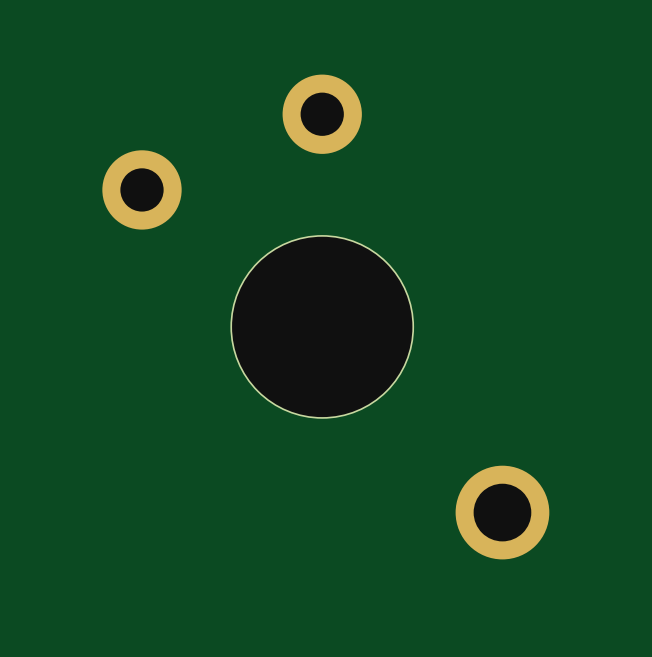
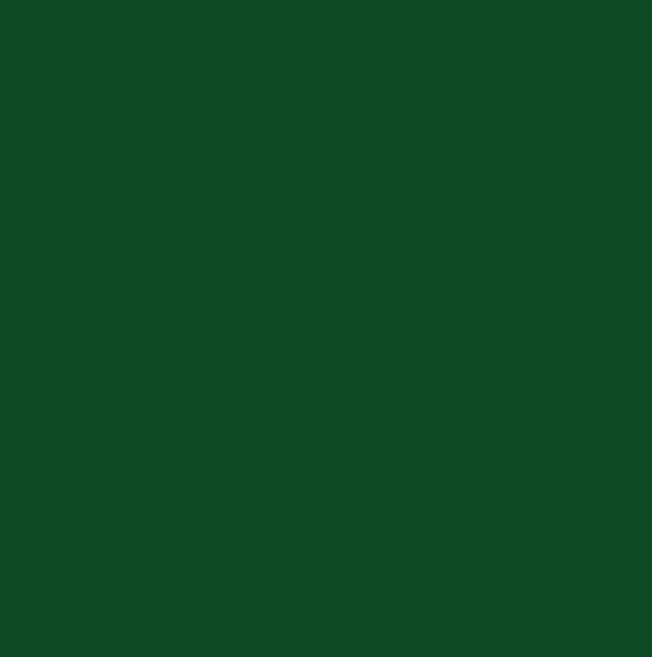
part: (325, 317) -> none

